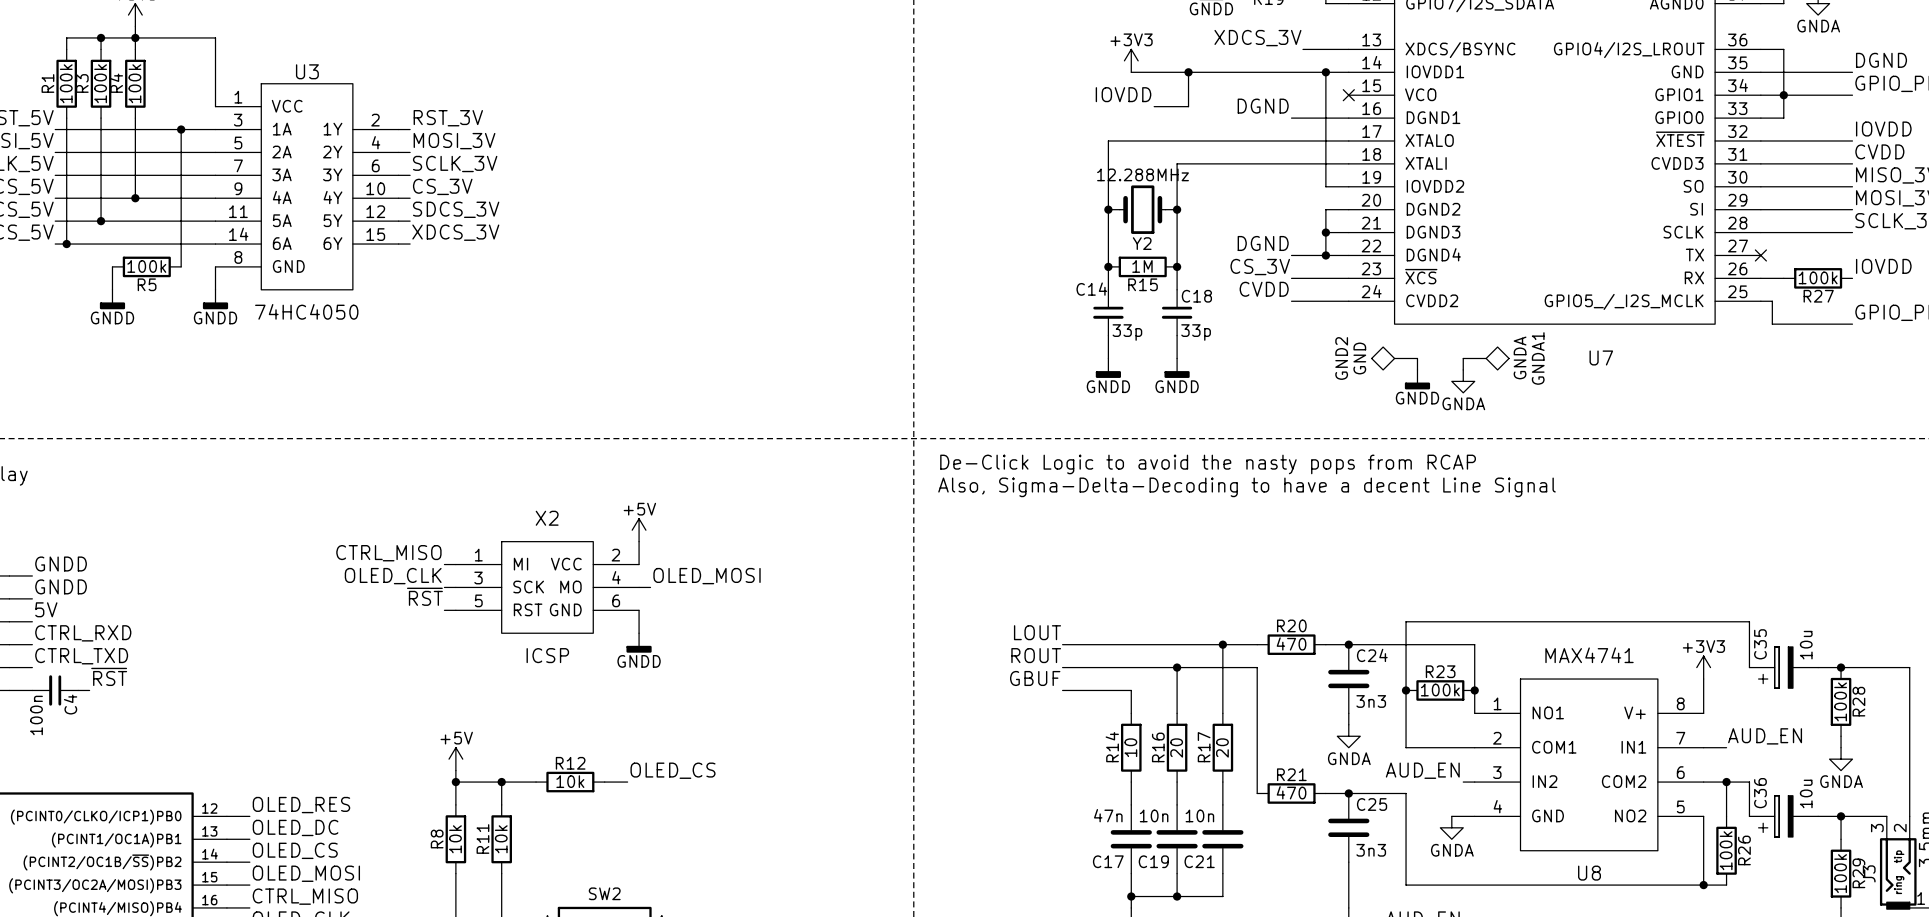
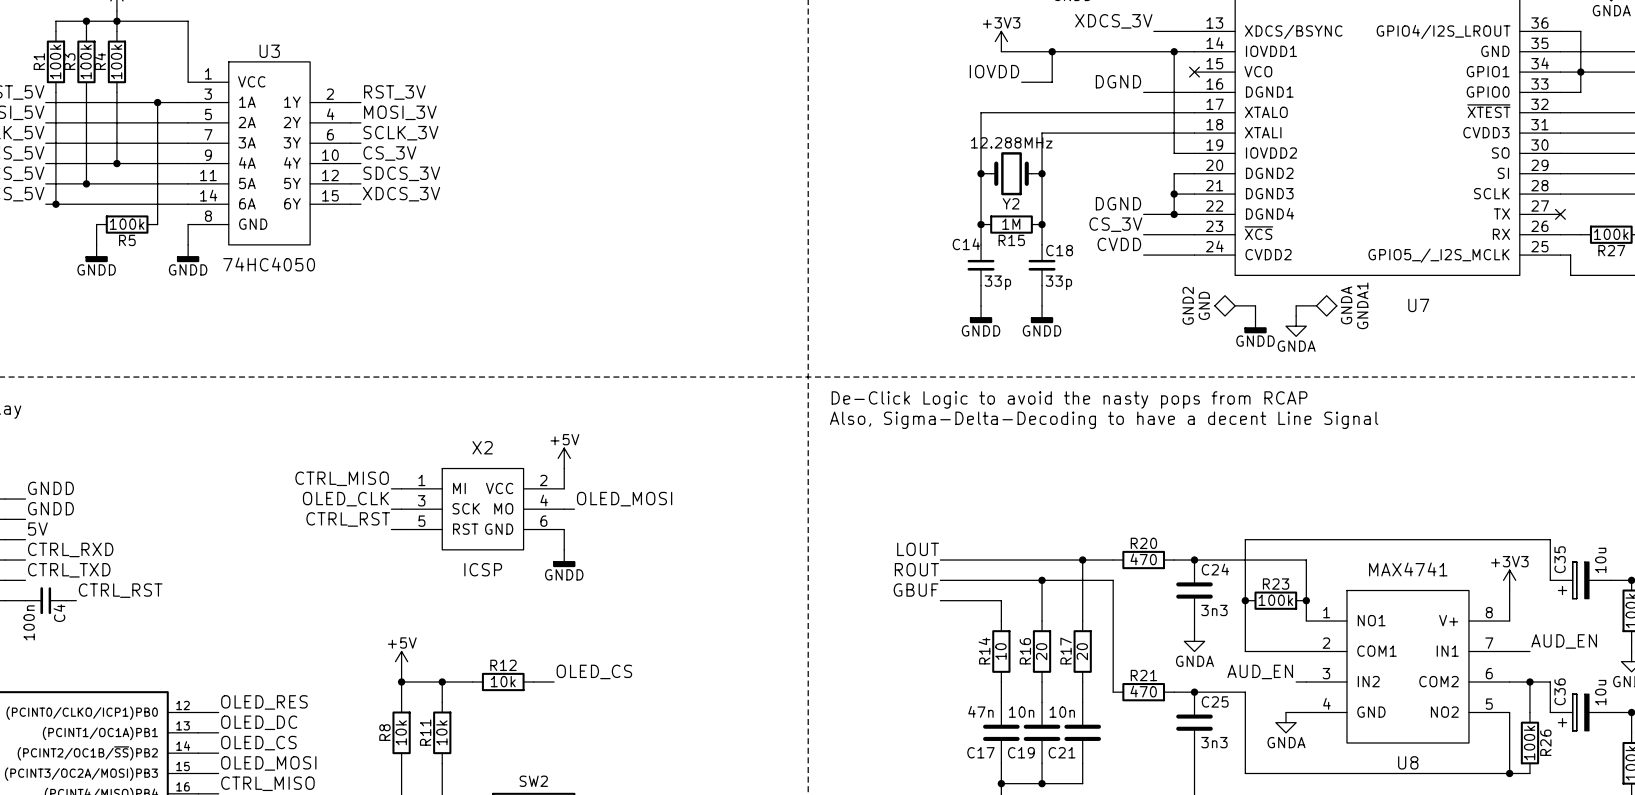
label: ~{RST} (424, 596) -> CTRL_RST (348, 519)
label: ~{RST} (109, 676) -> CTRL_RST (120, 590)

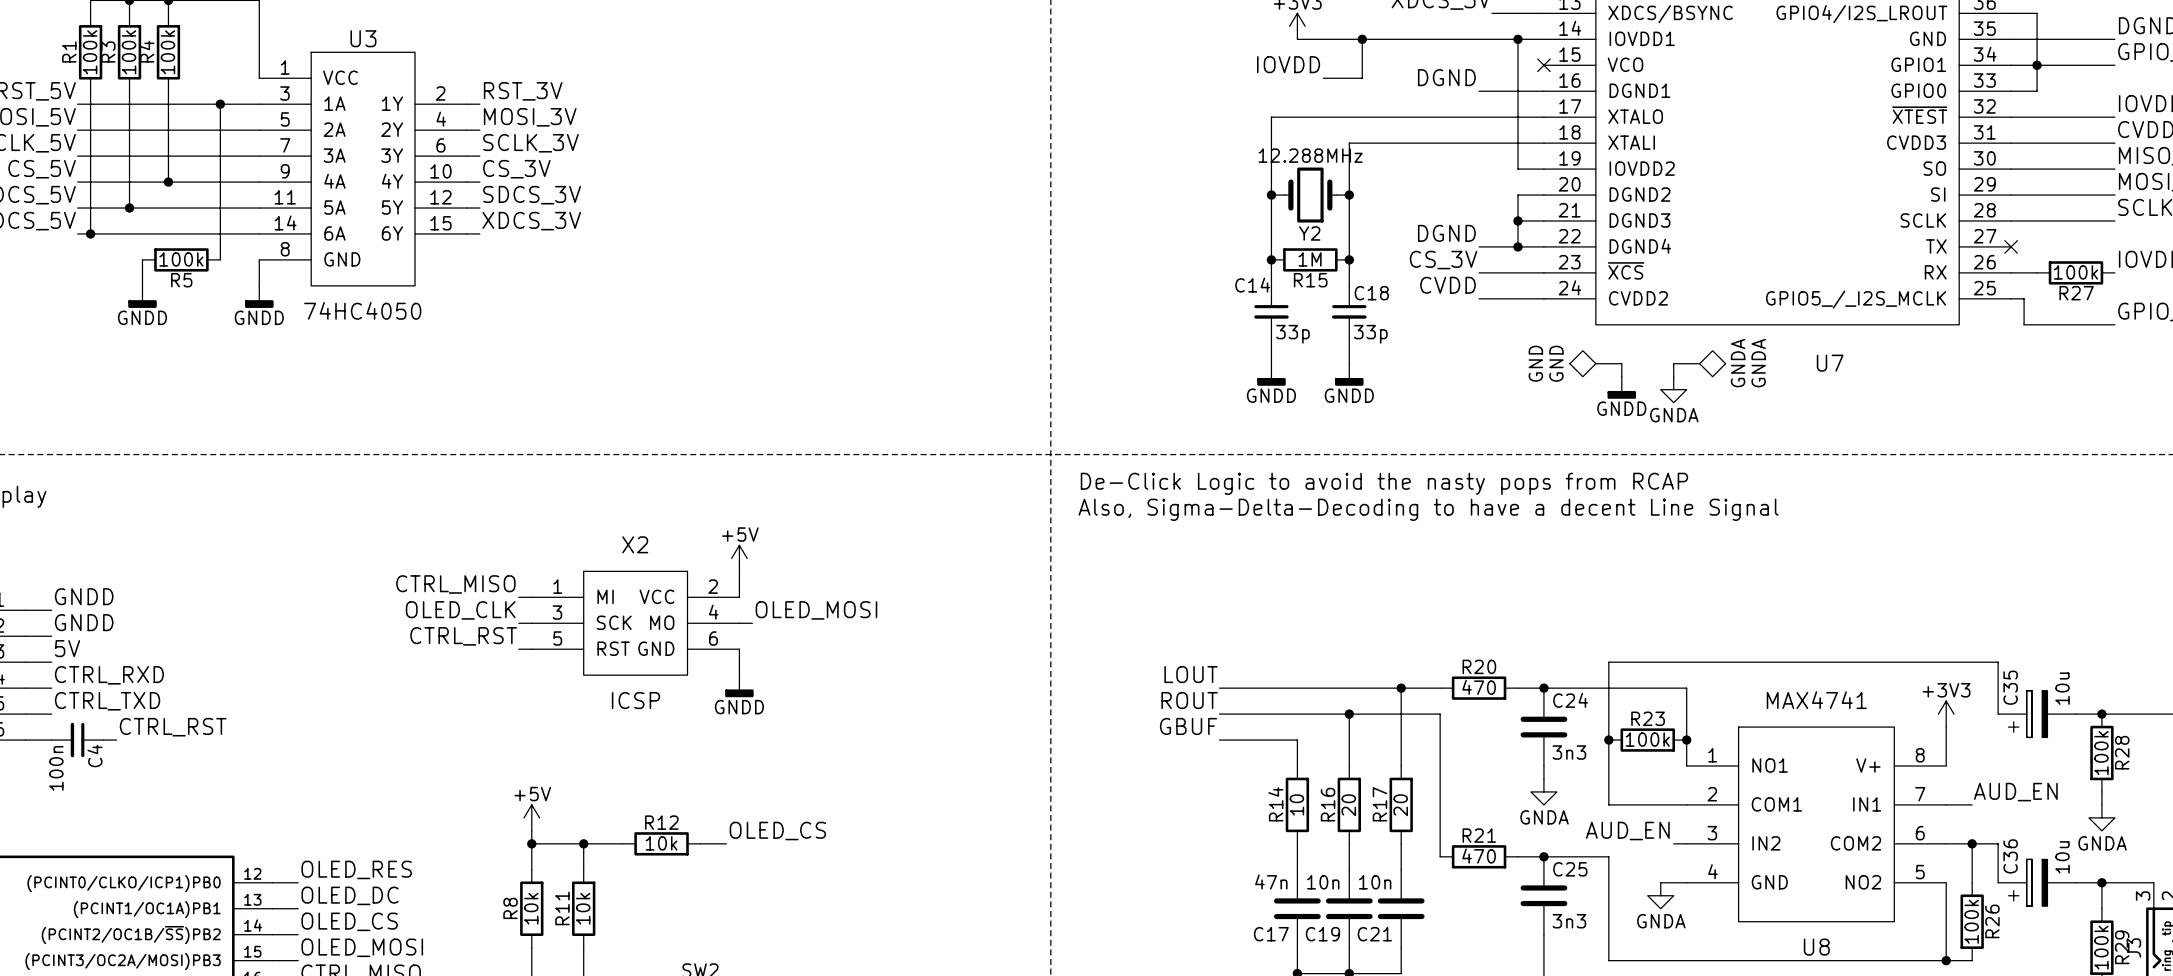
GND2 name: GND2 (1188, 305) -> GND (1535, 363)
GNDA1 name: GNDA1 (1362, 305) -> GNDA (1758, 363)

